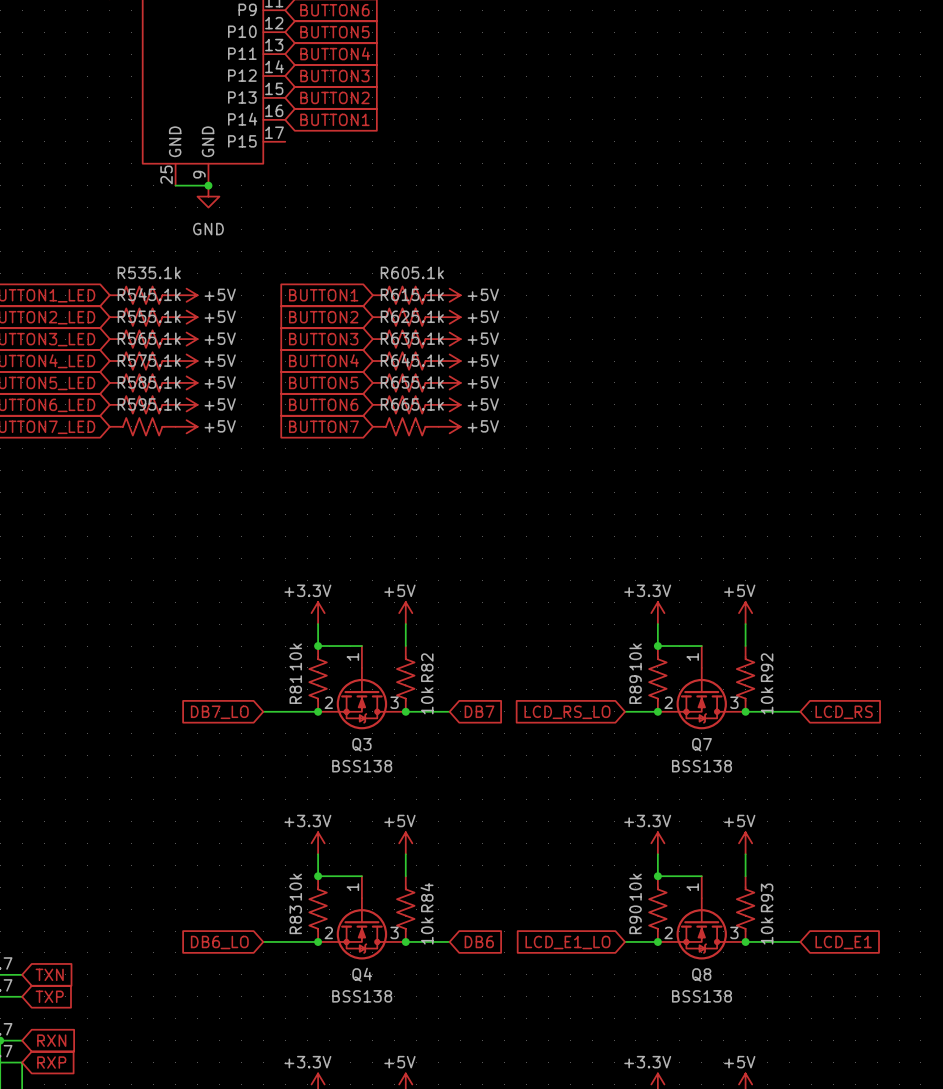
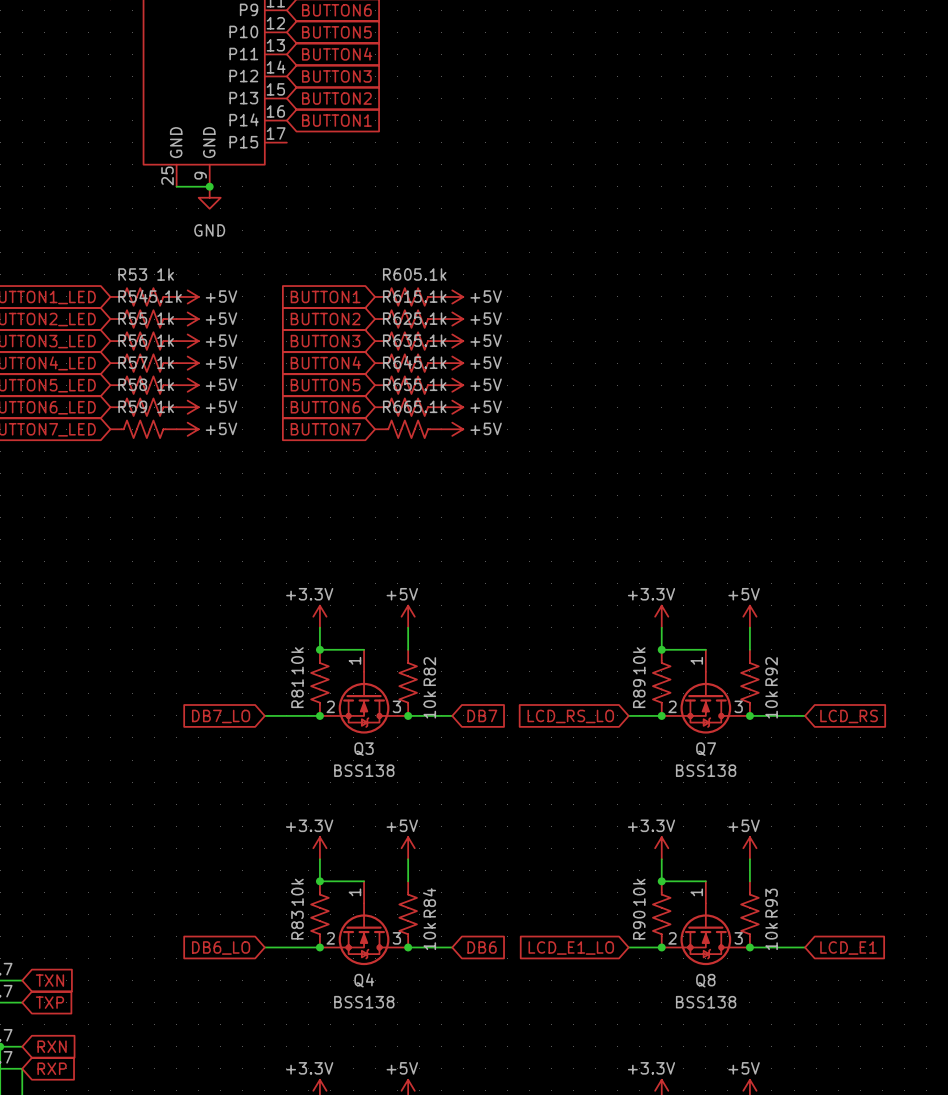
R53 value: 5.1k (164, 272) -> 1k (165, 274)
R55 value: 5.1k (164, 316) -> 1k (165, 318)
R56 value: 5.1k (164, 338) -> 1k (165, 340)
R57 value: 5.1k (164, 360) -> 1k (165, 362)
R58 value: 5.1k (164, 382) -> 1k (165, 384)
R59 value: 5.1k (164, 404) -> 1k (165, 406)

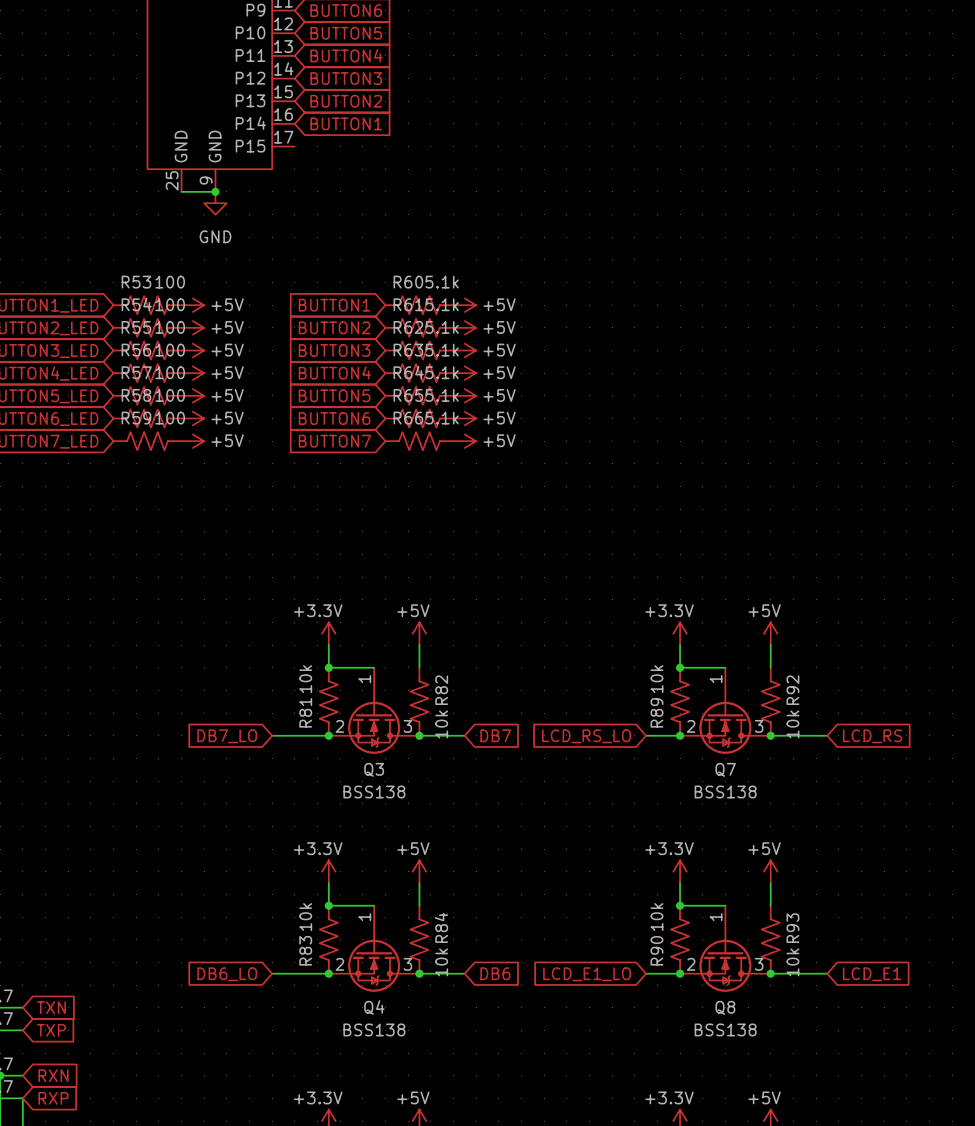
R53 value: 1k (165, 274) -> 100 (170, 282)
R54 value: 5.1k (165, 296) -> 100 (170, 304)
R55 value: 1k (165, 318) -> 100 (170, 327)
R56 value: 1k (165, 340) -> 100 (170, 350)
R57 value: 1k (165, 362) -> 100 (170, 372)
R58 value: 1k (165, 384) -> 100 (170, 395)
R59 value: 1k (165, 406) -> 100 (170, 418)

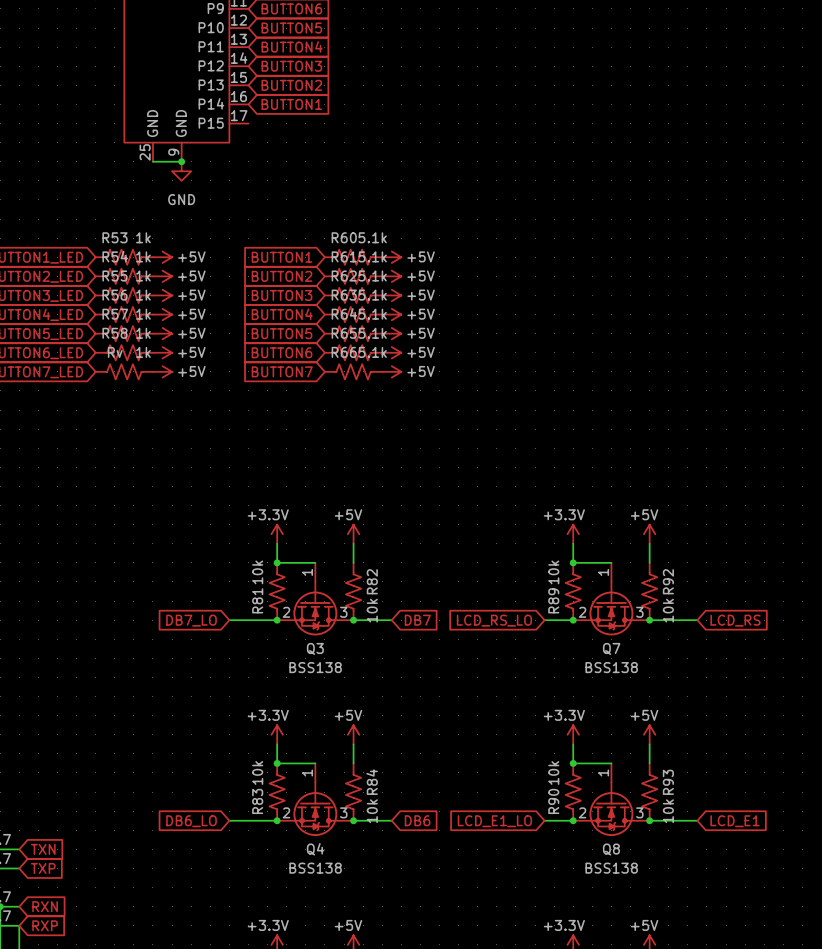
R53 value: 100 (170, 282) -> 1k (143, 237)
R54 value: 100 (170, 304) -> 1k (143, 256)
R55 value: 100 (170, 327) -> 1k (143, 275)
R56 value: 100 (170, 350) -> 1k (143, 295)
R57 value: 100 (170, 372) -> 1k (143, 314)
R58 value: 100 (170, 395) -> 1k (143, 333)
R59 name: R59 (136, 418) -> Rv (115, 352)
R59 value: 100 (170, 418) -> 1k (143, 352)

